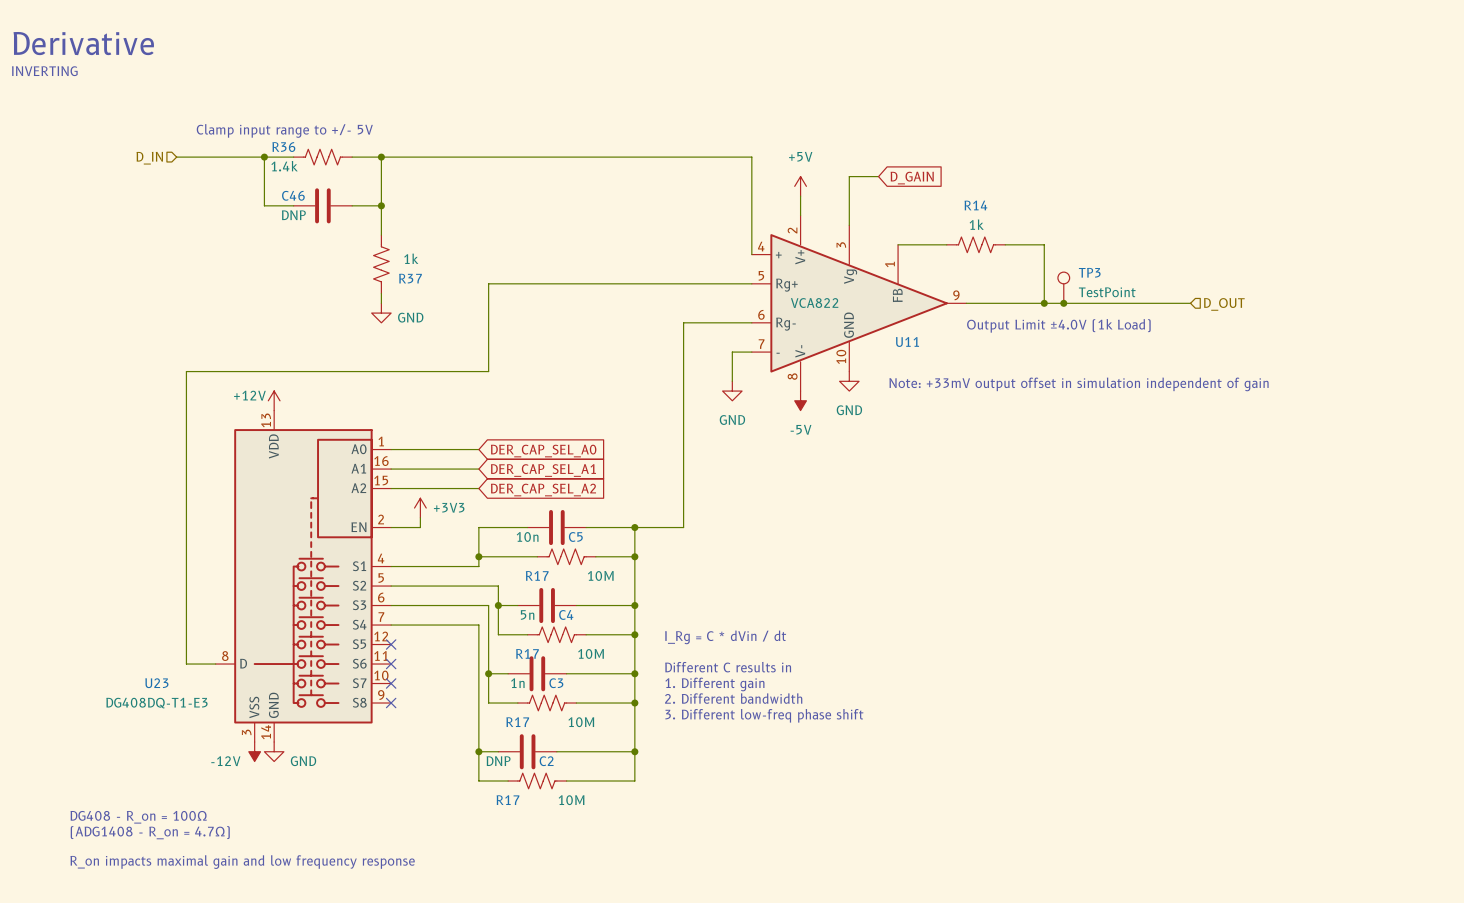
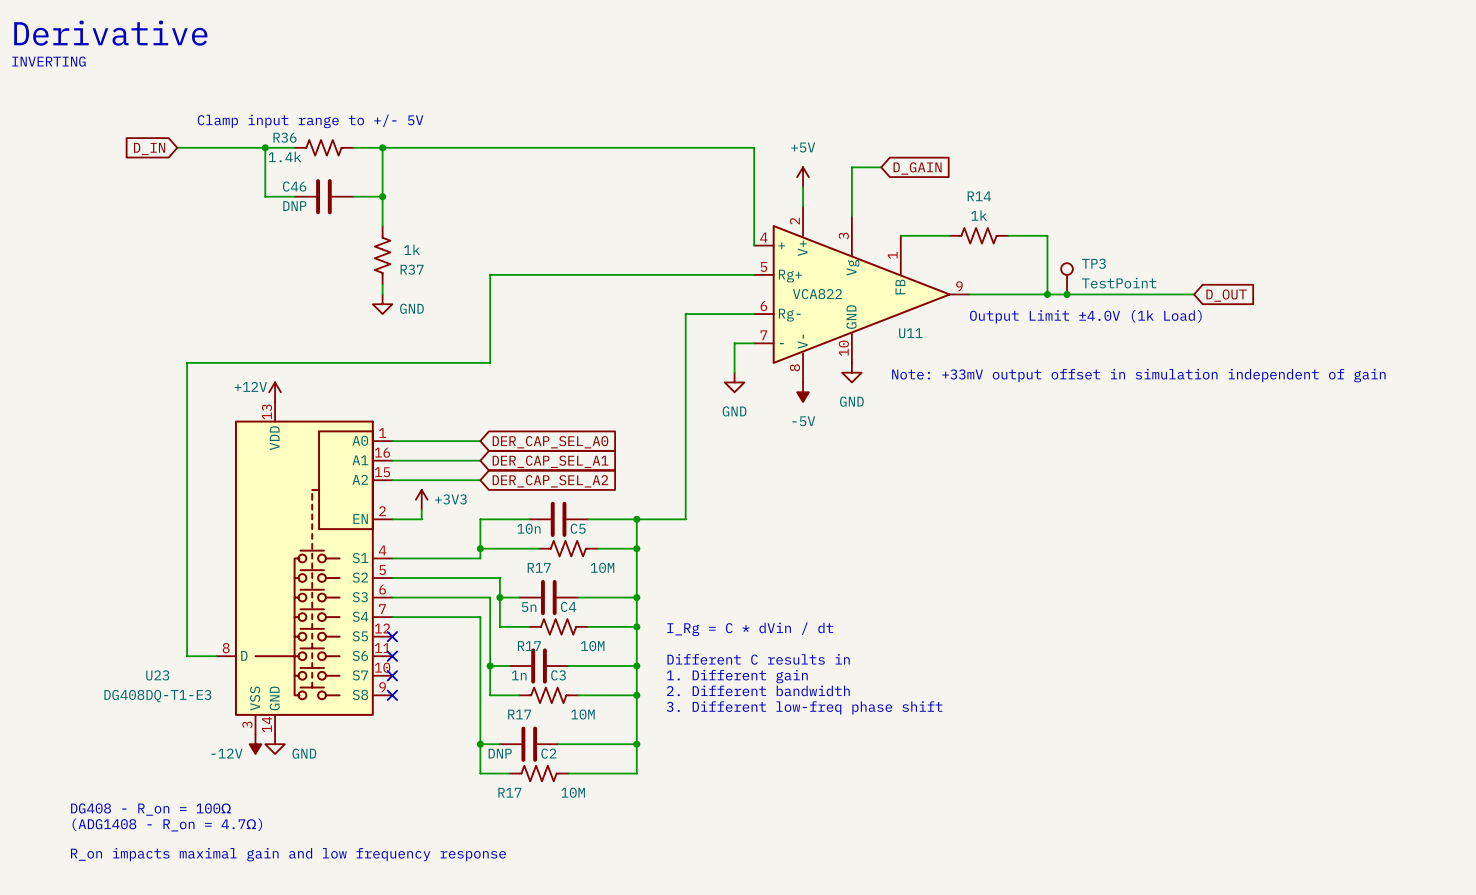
hierarchical label: D_IN (149, 158) -> none
global label: none -> D_IN (149, 148)
global label: none -> D_OUT (1226, 295)
hierarchical label: D_OUT (1224, 304) -> none

